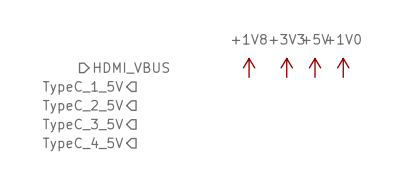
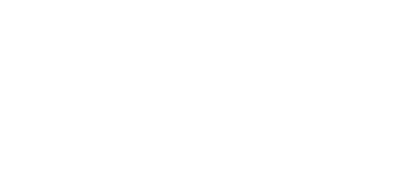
power symbol: +1V8 (249, 67) -> none
power symbol: +3V3 (286, 67) -> none
power symbol: +5V (315, 67) -> none
power symbol: +1V0 (343, 67) -> none
hierarchical label: HDMI_VBUS (131, 68) -> none
hierarchical label: TypeC_1_5V (82, 87) -> none
hierarchical label: TypeC_2_5V (82, 106) -> none
hierarchical label: TypeC_3_5V (82, 125) -> none
hierarchical label: TypeC_4_5V (82, 144) -> none

